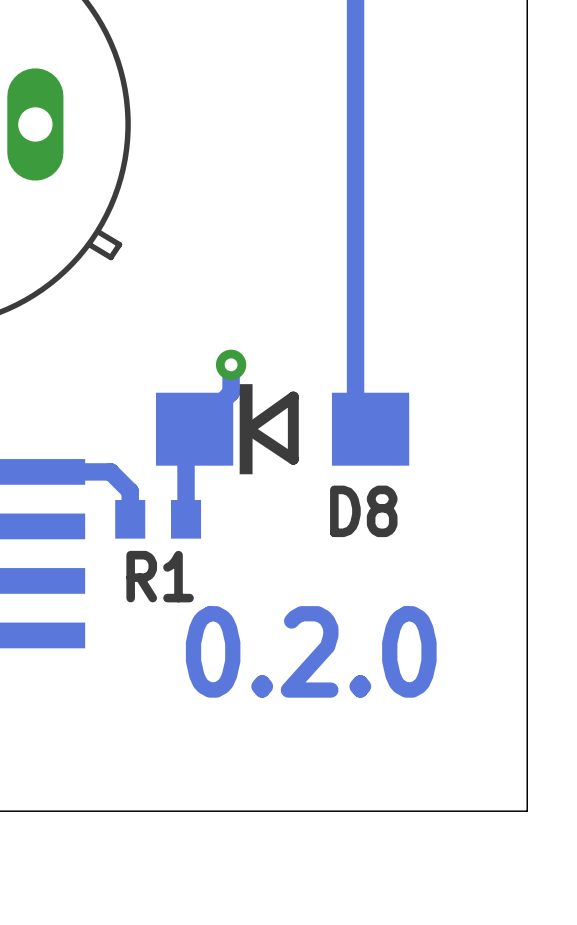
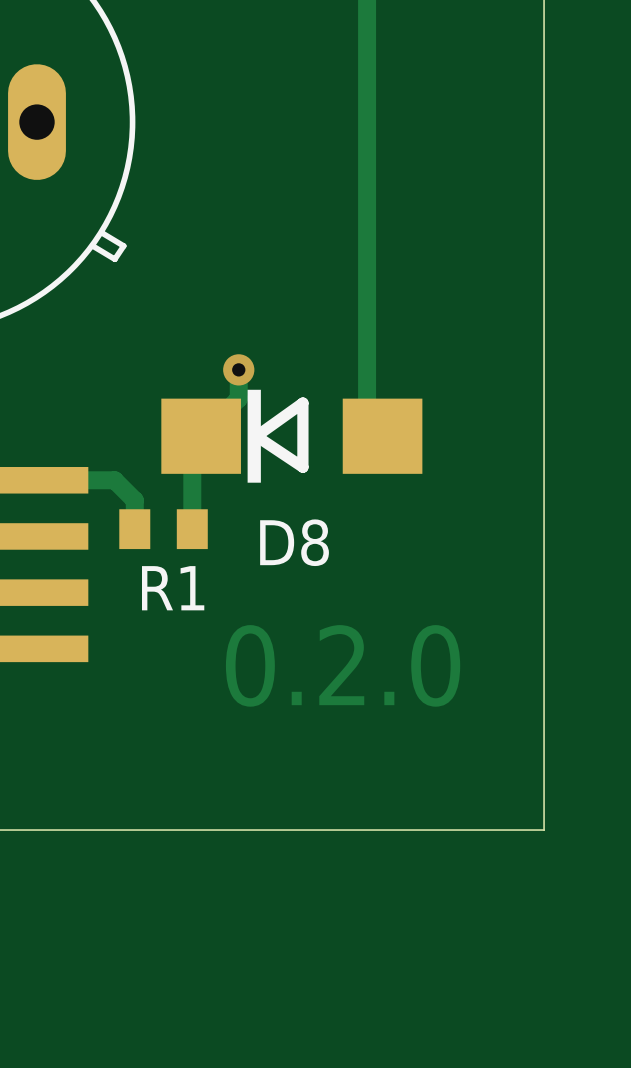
D8 name position: D8 (363, 511) -> D8 (294, 542)

